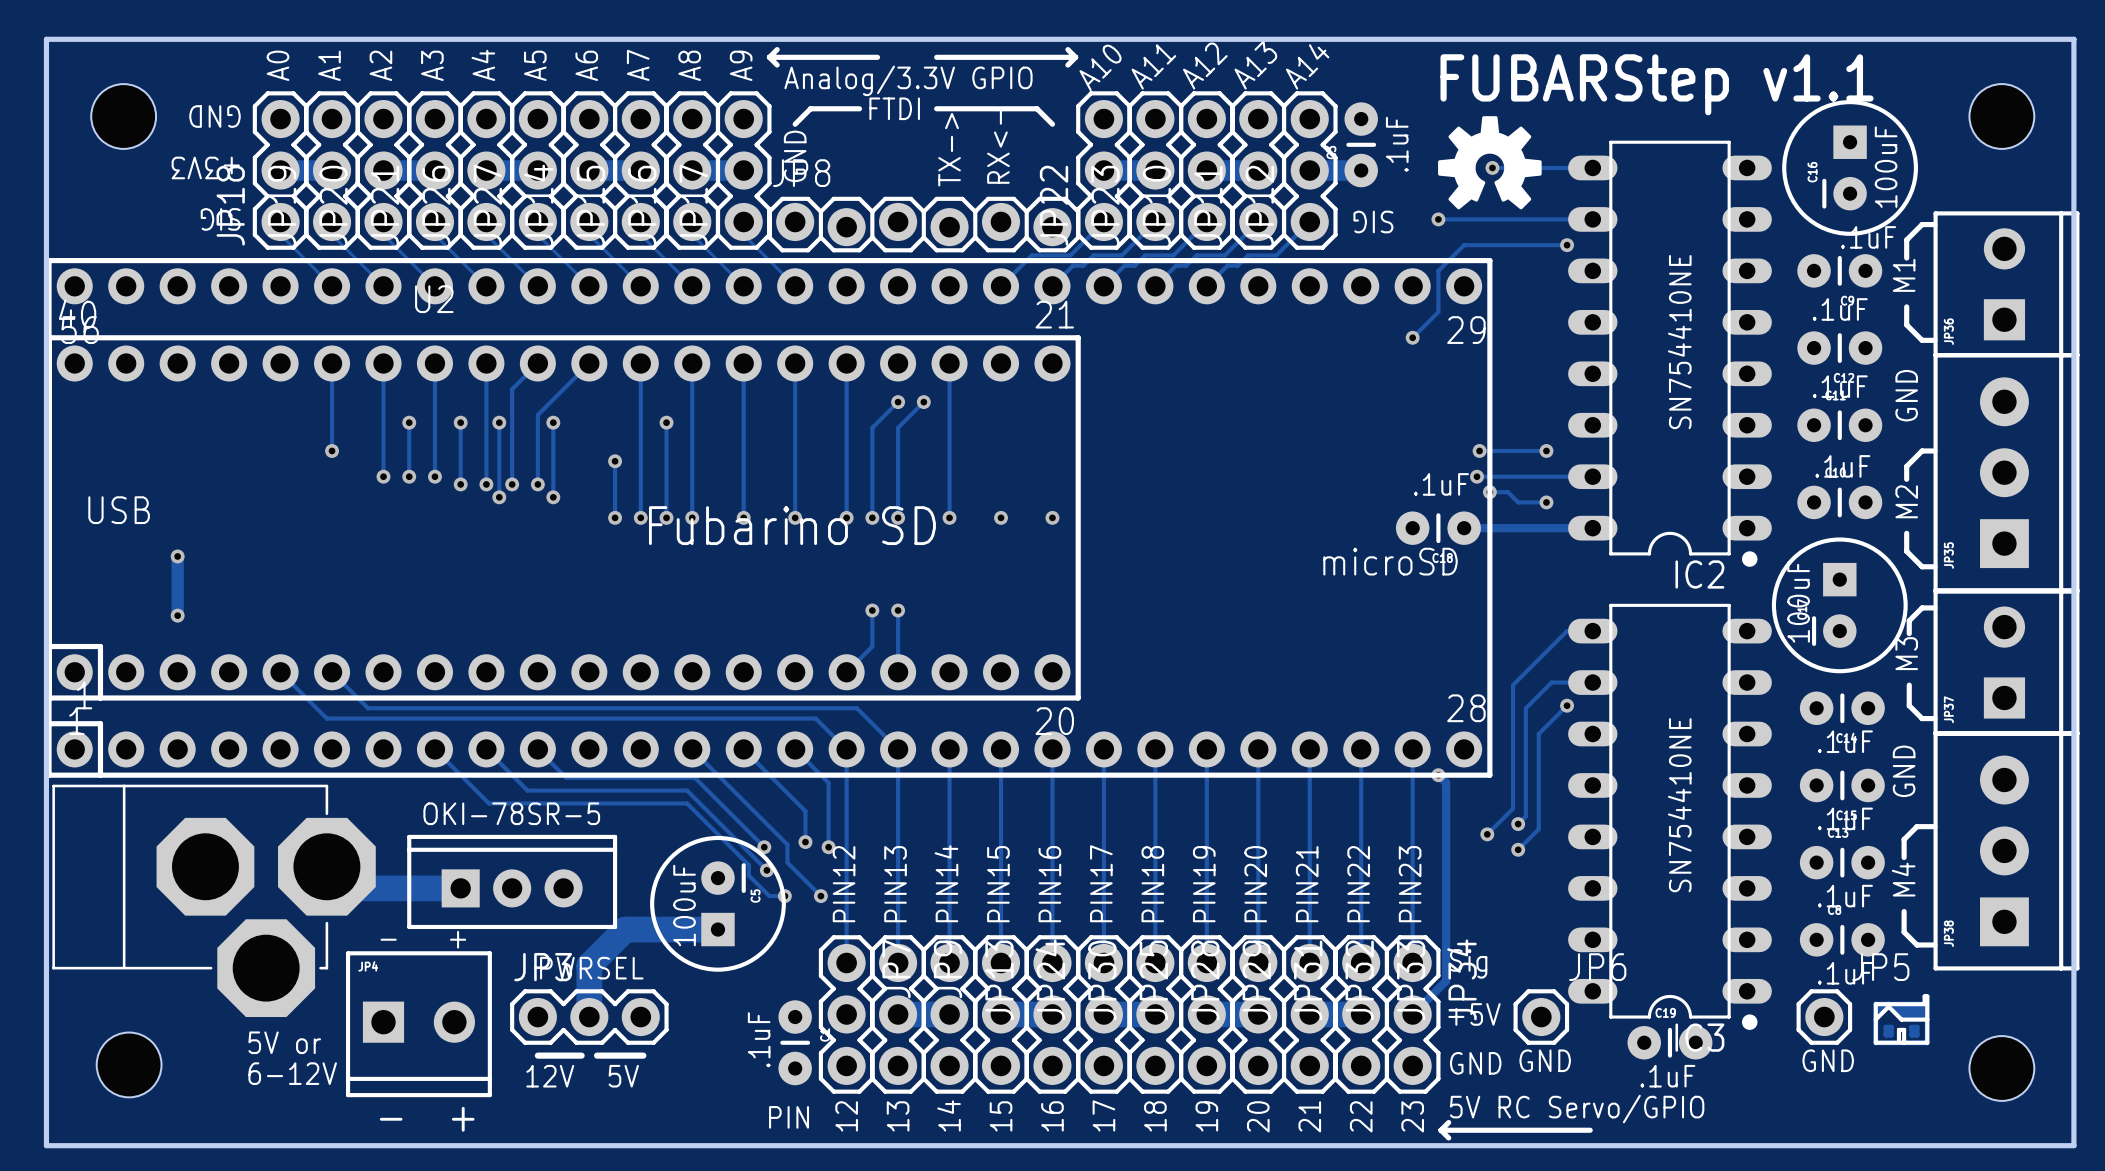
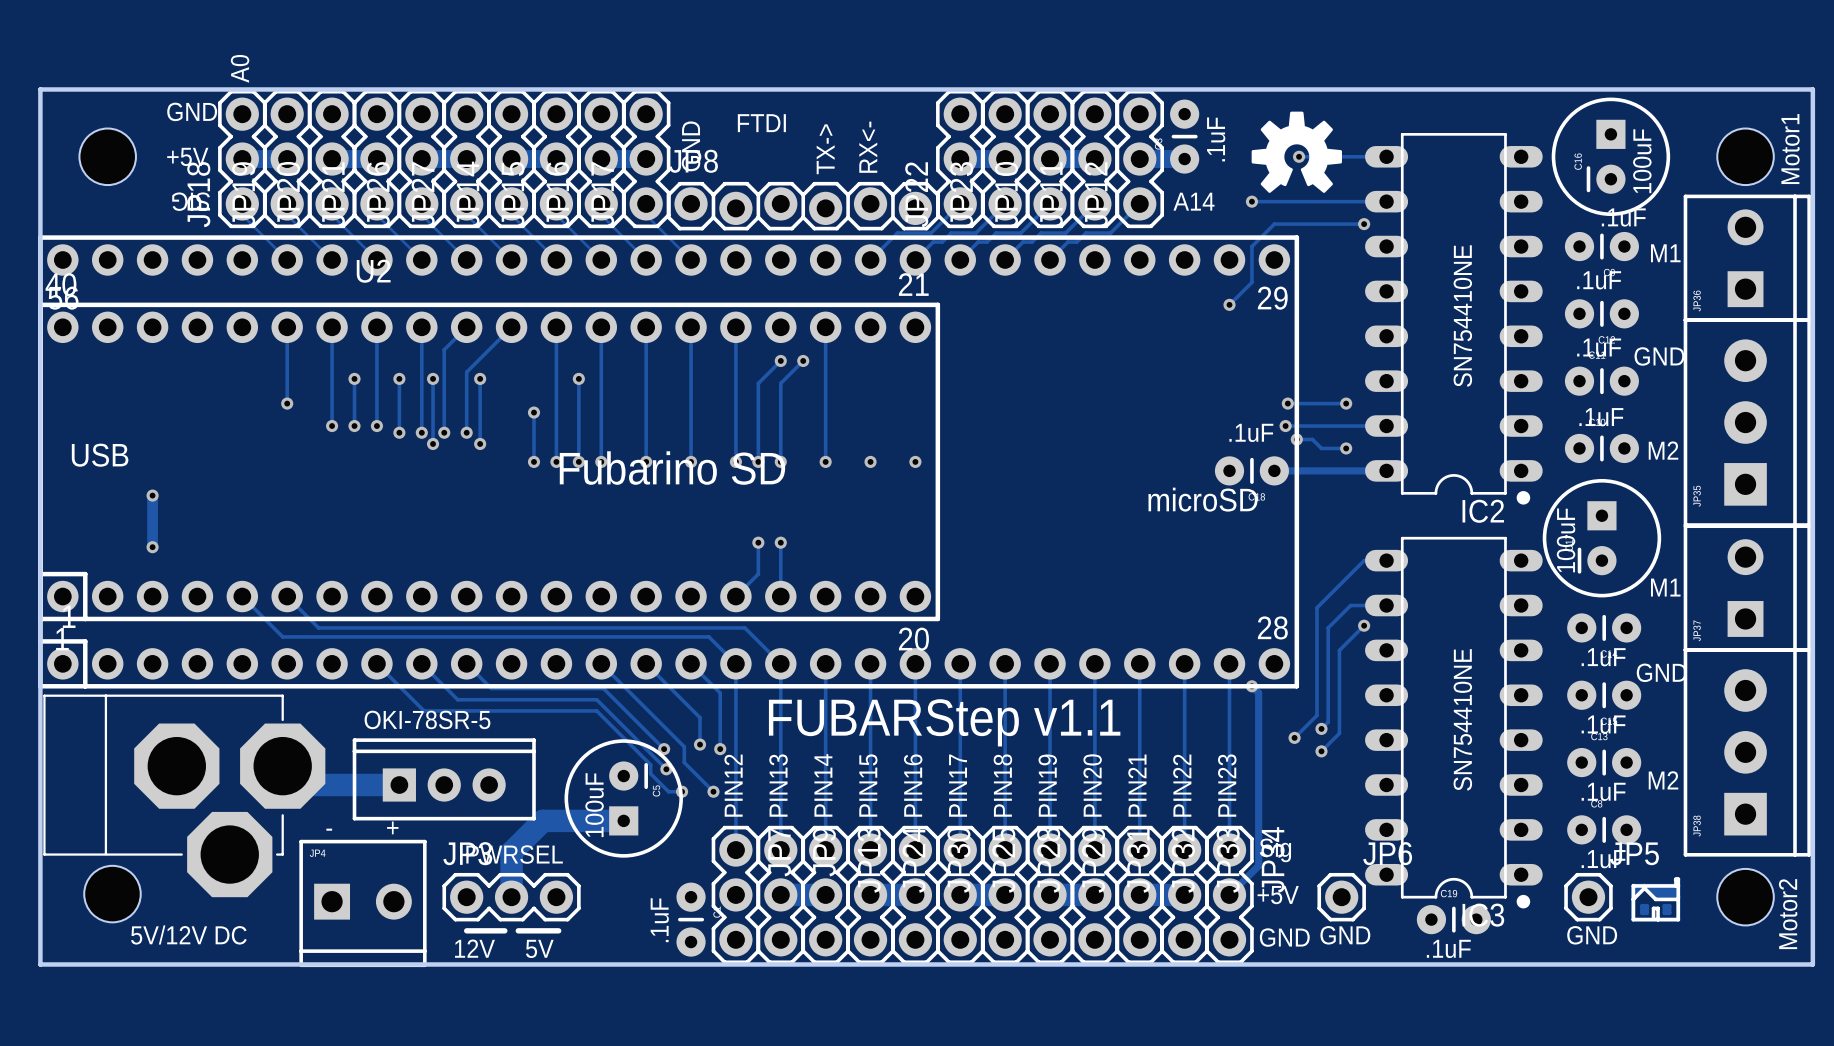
board edge: (46, 39) (2073, 39) (2073, 1145) (46, 1145) (46, 39) -> (40, 89) (40, 964) (1812, 964) (1812, 89) (40, 89)
line: (777, 49) (769, 57) -> none
line: (1067, 49) (1075, 57) -> none
line: (769, 57) (877, 57) -> none
line: (769, 57) (777, 65) -> none
line: (936, 57) (1075, 57) -> none
line: (1075, 57) (1067, 65) -> none
text: A1 (329, 65) -> none
text: A2 (380, 65) -> none
text: A3 (432, 65) -> none
text: A4 (483, 65) -> none
text: A5 (535, 65) -> none
text: A6 (586, 65) -> none
text: A7 (638, 65) -> none
text: A8 (689, 65) -> none
text: A9 (741, 65) -> none
text: A13 (1255, 65) -> none
text: A11 (1153, 66) -> none
text: A12 (1205, 66) -> none
text rotation: 0° (1307, 66) -> 45° clockwise (1193, 201)
text position: A14 (1307, 66) -> A14 (1193, 201)
text: A10 (1100, 67) -> none
text: Analog/3.3V GPIO (908, 80) -> none
text: FUBARStep v1.1 (1657, 84) -> none
line: (859, 108) (810, 108) (795, 124) -> none
text position: FTDI (894, 108) -> FTDI (761, 123)
line: (936, 108) (1037, 108) (1052, 124) -> none
hole position: (123, 116) -> (107, 156)
text rotation: 0° (214, 116) -> 180° (192, 111)
hole position: (2001, 116) -> (1745, 156)
text: none -> Motor1 (1790, 149)
text: +3V3 (205, 167) -> none
text: none -> +5V (187, 156)
text: SIG (1373, 221) -> none
line: (1934, 224) (1922, 224) (1906, 240) (1906, 258) -> none
text rotation: 0° (1904, 275) -> 90° clockwise (1665, 253)
line: (1906, 306) (1906, 324) (1922, 340) (1934, 340) -> none
text rotation: 0° (1906, 395) -> 90° clockwise (1659, 356)
line: (1934, 450) (1922, 450) (1906, 466) (1906, 479) -> none
text rotation: 0° (1906, 501) -> 90° clockwise (1663, 450)
line: (1906, 533) (1906, 551) (1922, 566) (1934, 566) -> none
line: (1934, 607) (1922, 607) (1909, 620) (1909, 633) -> none
text: M3 (1906, 653) -> none
text: none -> M1 (1665, 587)
line: (1909, 685) (1909, 705) (1922, 718) (1934, 718) -> none
text rotation: 0° (1904, 771) -> 90° clockwise (1661, 672)
text: none -> FUBARStep v1.1 (944, 722)
line: (1934, 826) (1916, 826) (1904, 839) (1904, 857) -> none
text: M4 (1903, 879) -> none
text: none -> M2 (1663, 780)
line: (1904, 911) (1904, 932) (1916, 944) (1934, 944) -> none
text: none -> Motor2 (1788, 914)
text: 5V or (284, 1042) -> none
text: none -> 5V/12V DC (188, 934)
hole position: (129, 1064) -> (112, 894)
hole position: (2001, 1068) -> (1745, 897)
text: 6-12V (292, 1073) -> none
text: 5V RC Servo/GPIO (1577, 1109) -> none
text: 14 (949, 1115) -> none
text: 17 (1103, 1115) -> none
text: 12 (846, 1116) -> none
text: 13 (898, 1116) -> none
text: 15 (1001, 1116) -> none
text: 16 (1052, 1116) -> none
text: 18 (1155, 1116) -> none
text: 19 (1206, 1116) -> none
text: 20 (1258, 1116) -> none
text: 21 (1309, 1116) -> none
text: 22 (1361, 1116) -> none
text: 23 (1412, 1116) -> none
text: PIN (789, 1117) -> none
text: - (391, 1119) -> none
text: + (463, 1119) -> none
line: (1448, 1122) (1440, 1130) -> none
line: (1440, 1130) (1590, 1130) -> none
line: (1440, 1130) (1448, 1137) -> none

